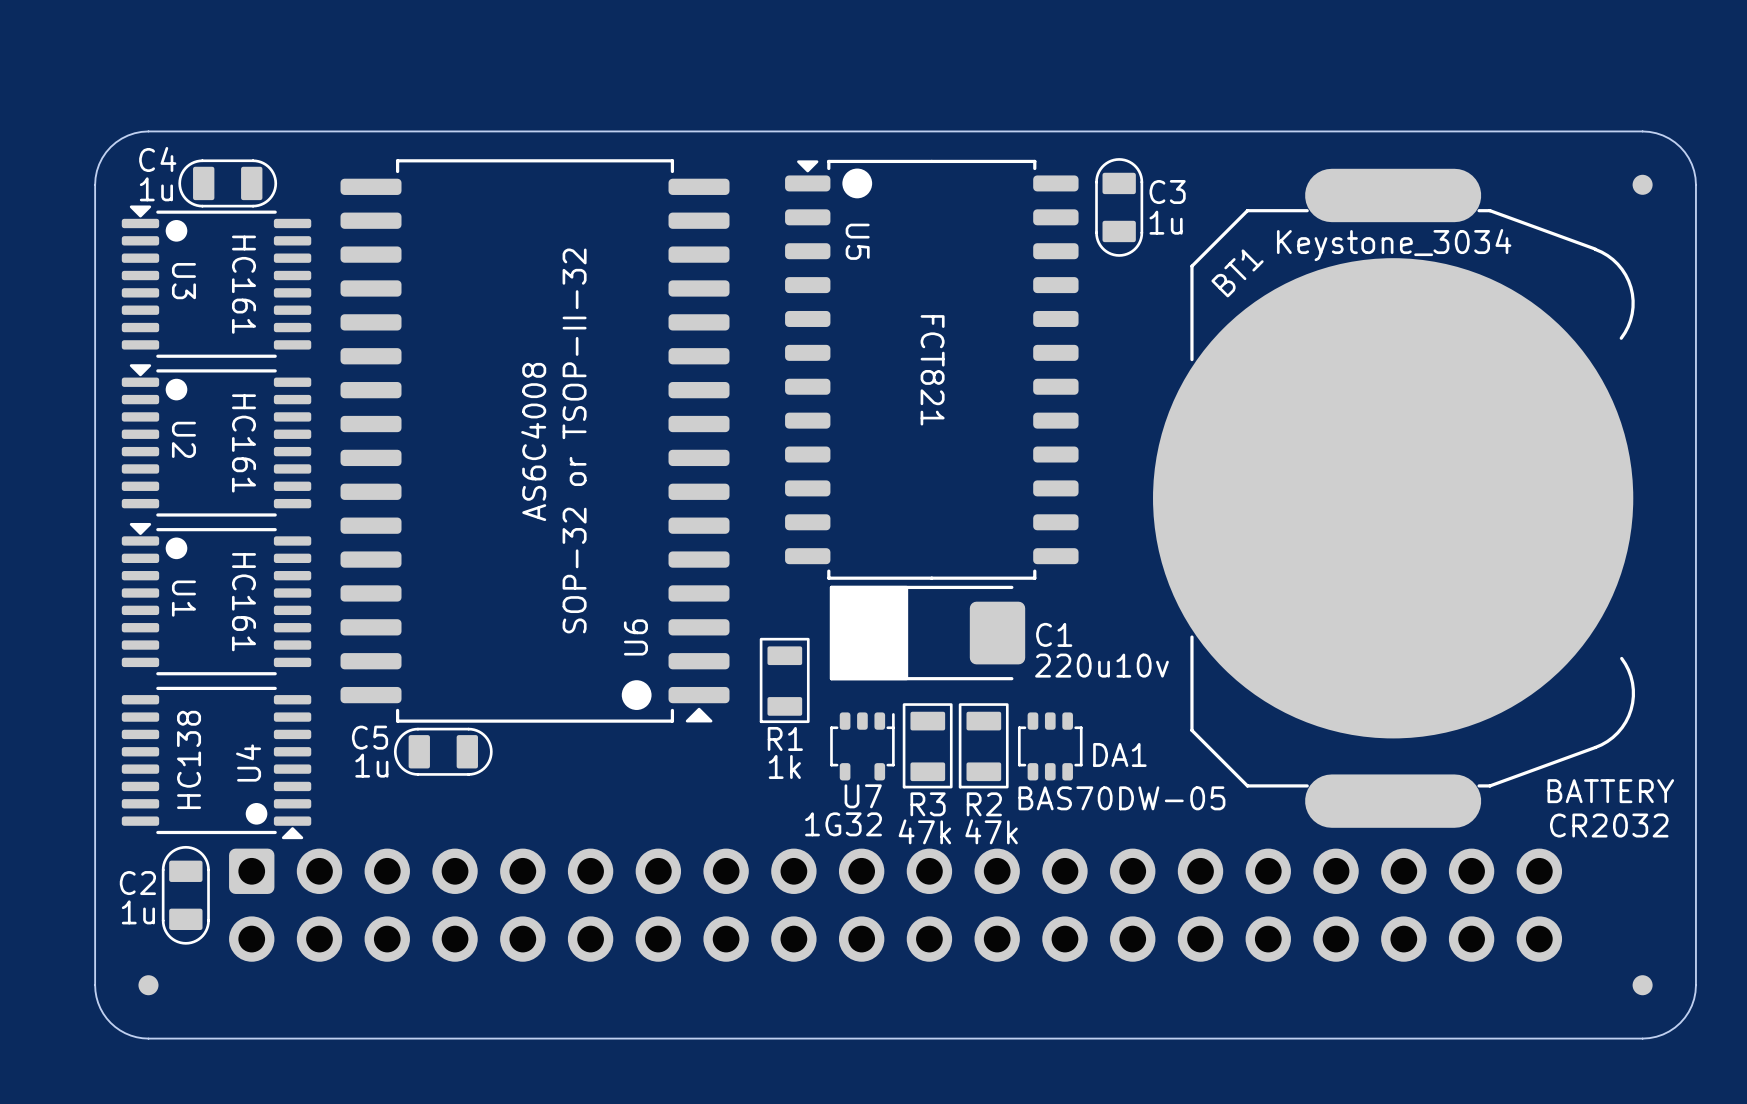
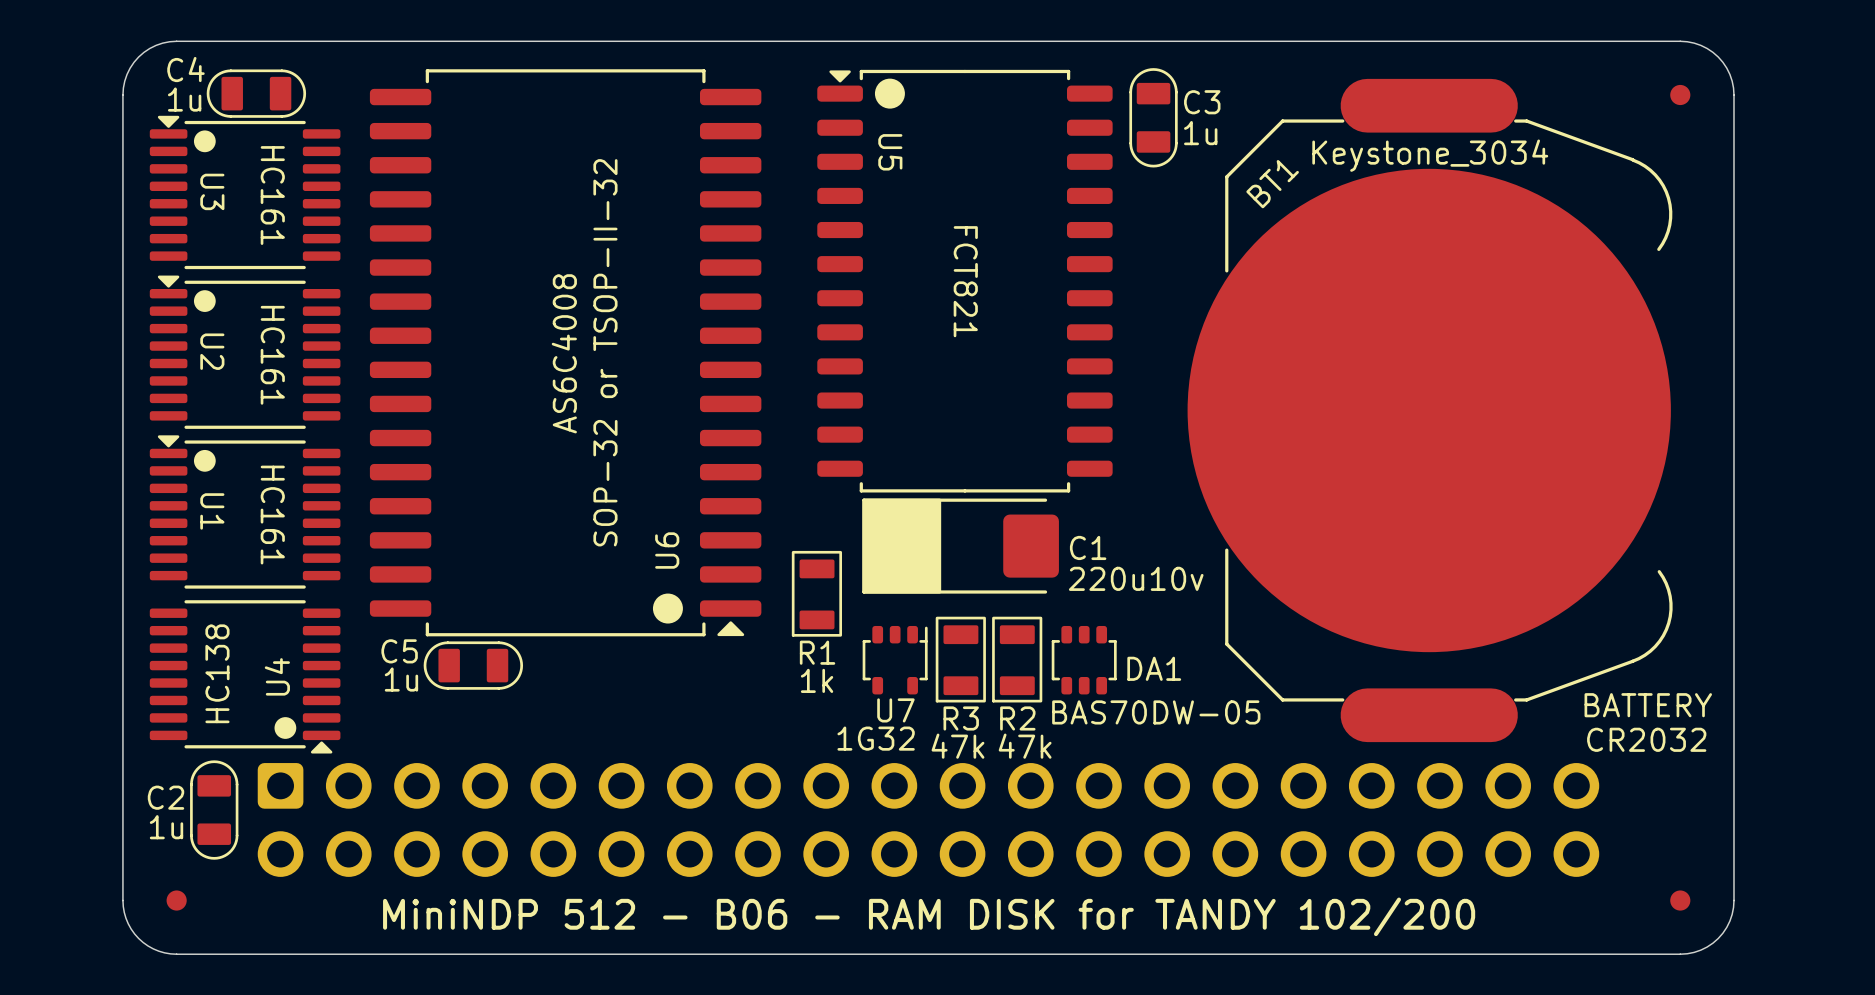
text: none -> MiniNDP 512 - B06 - RAM DISK for TANDY 102/200 (929, 916)

